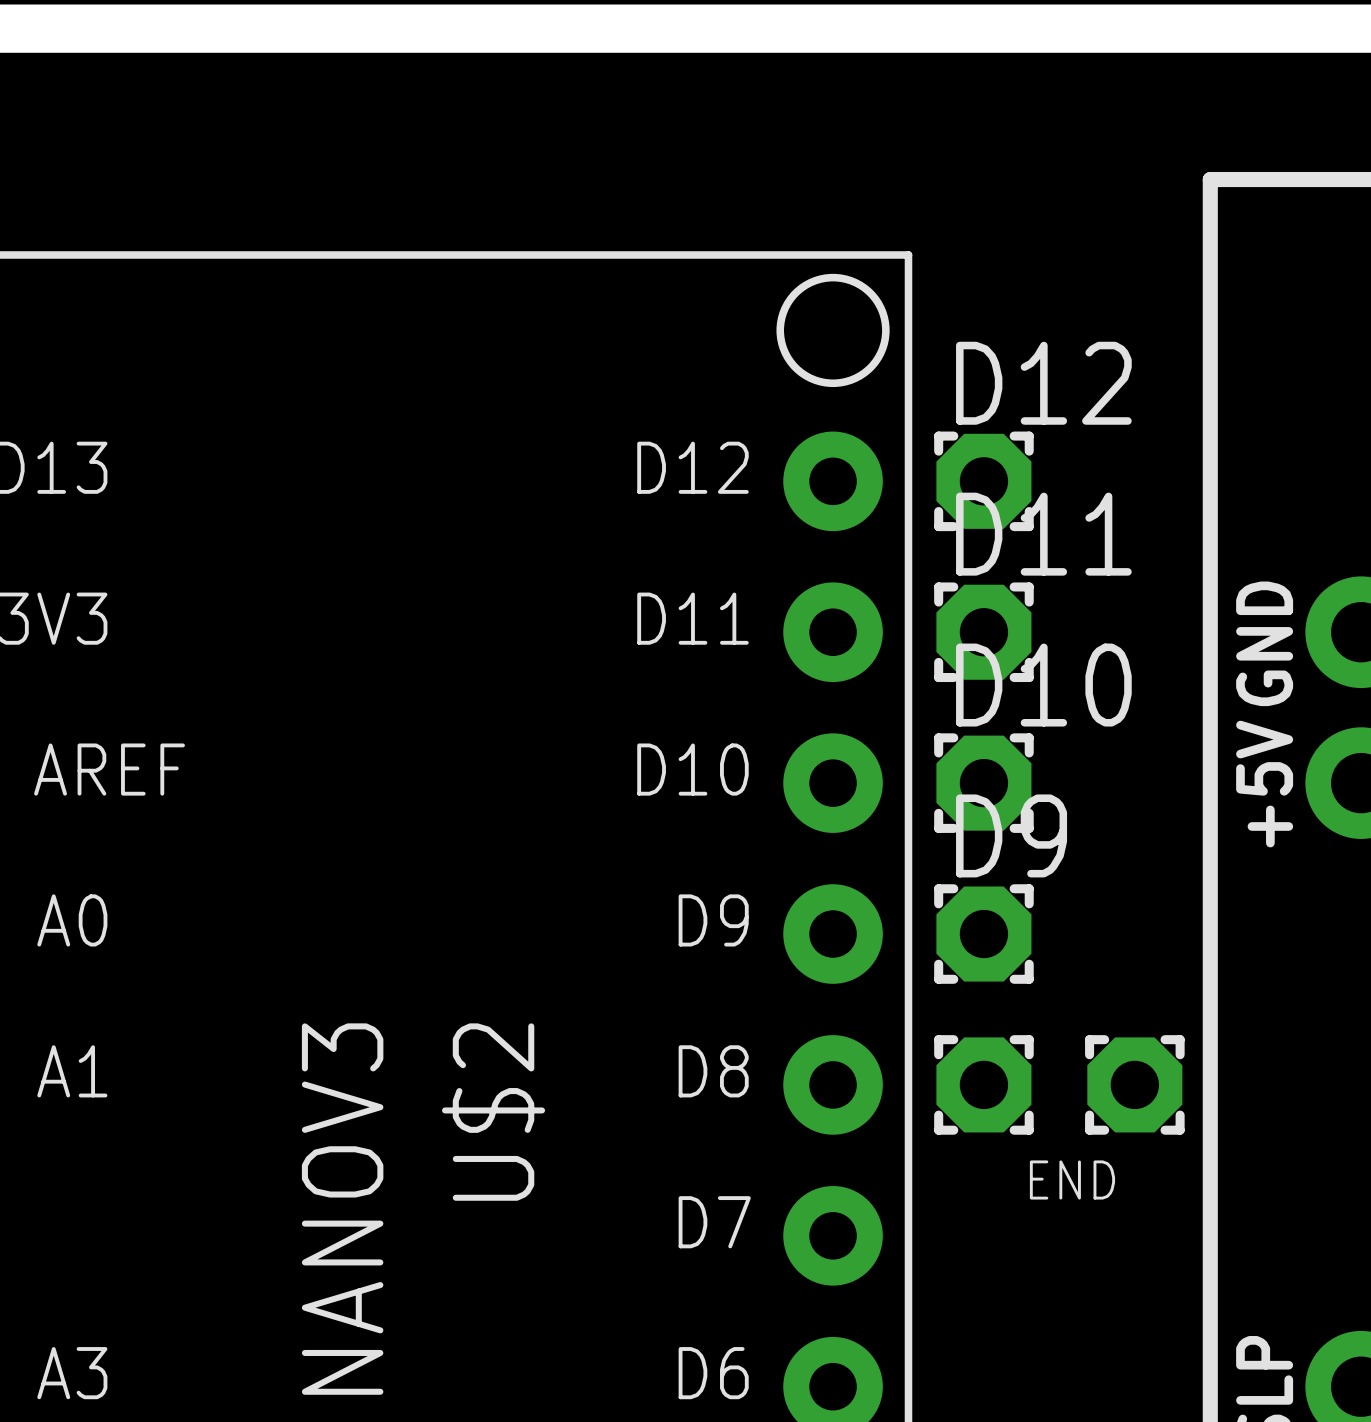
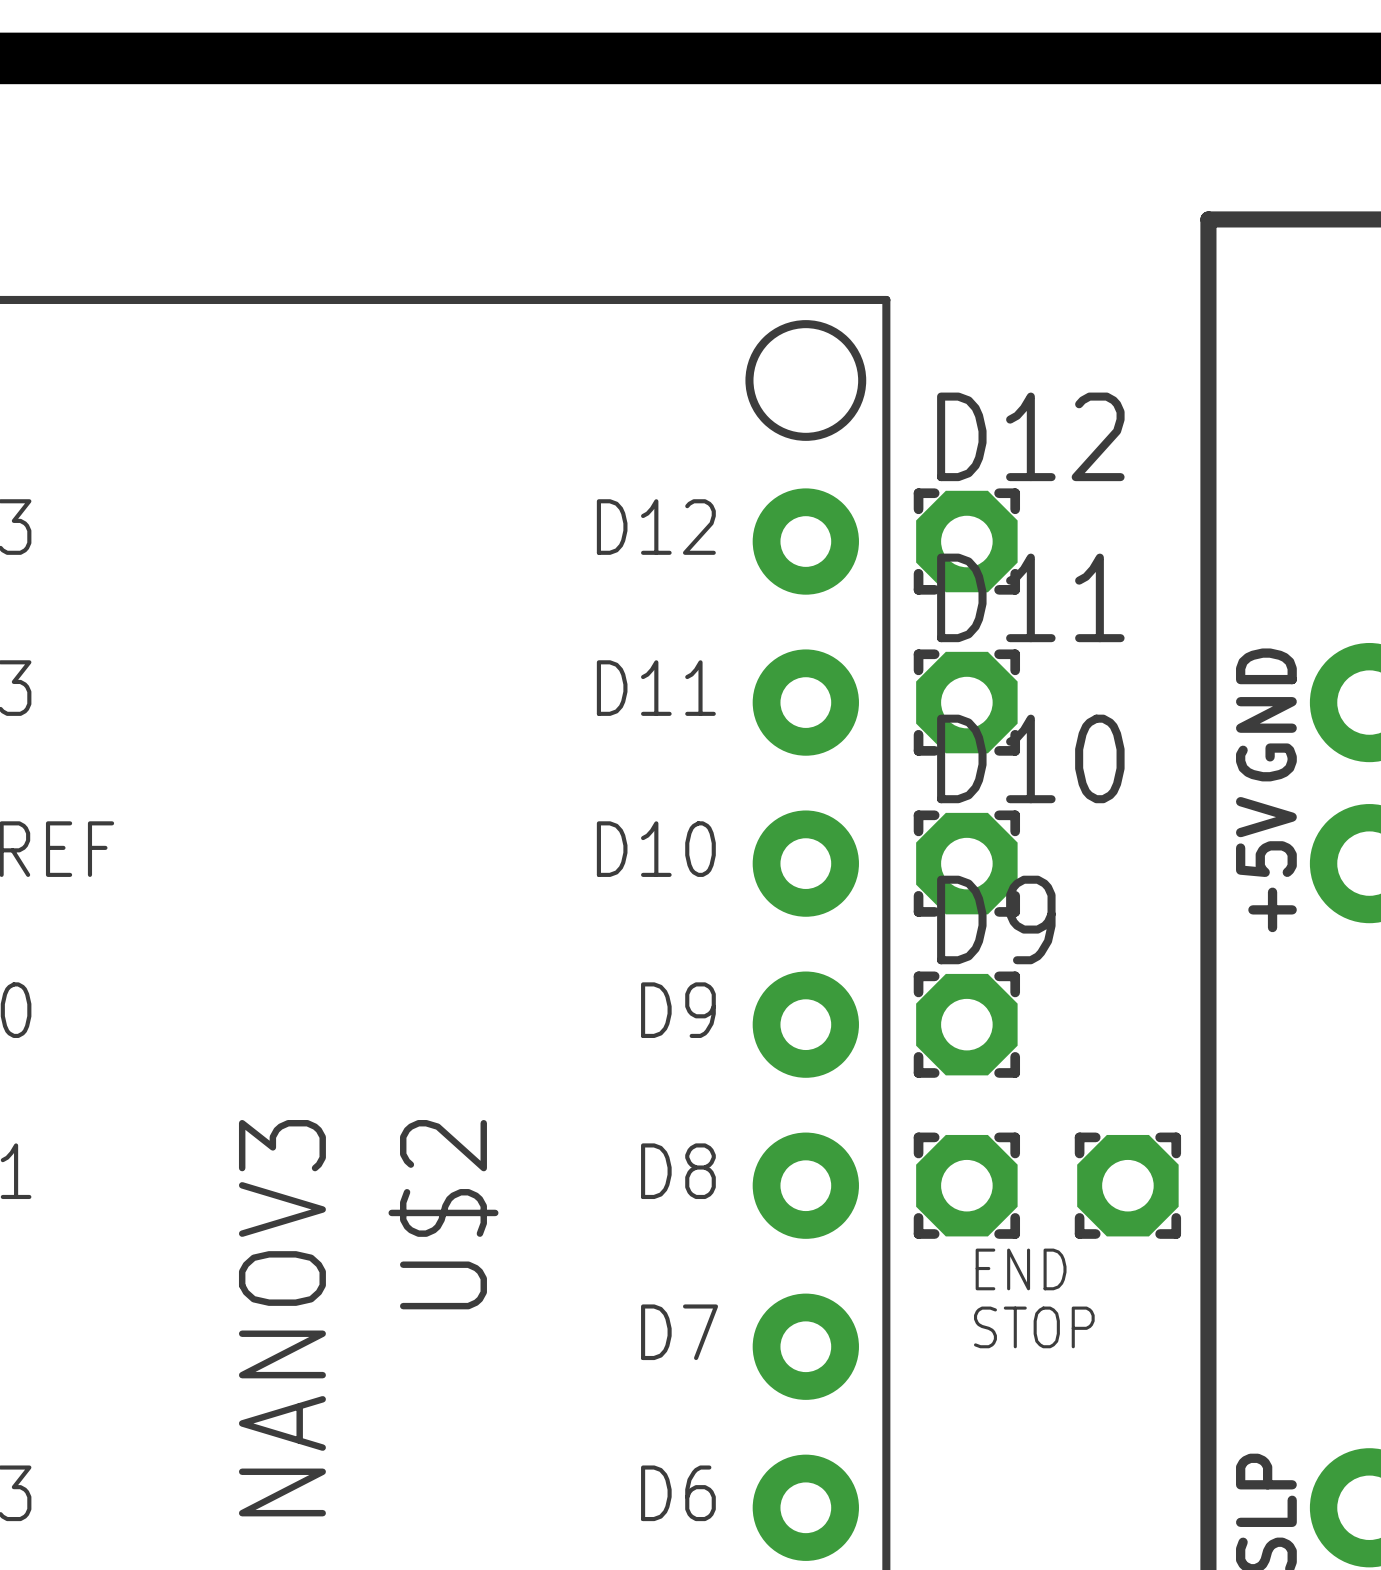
text position: END (1072, 1179) -> END (1021, 1269)
text: none -> STOP (1034, 1327)

